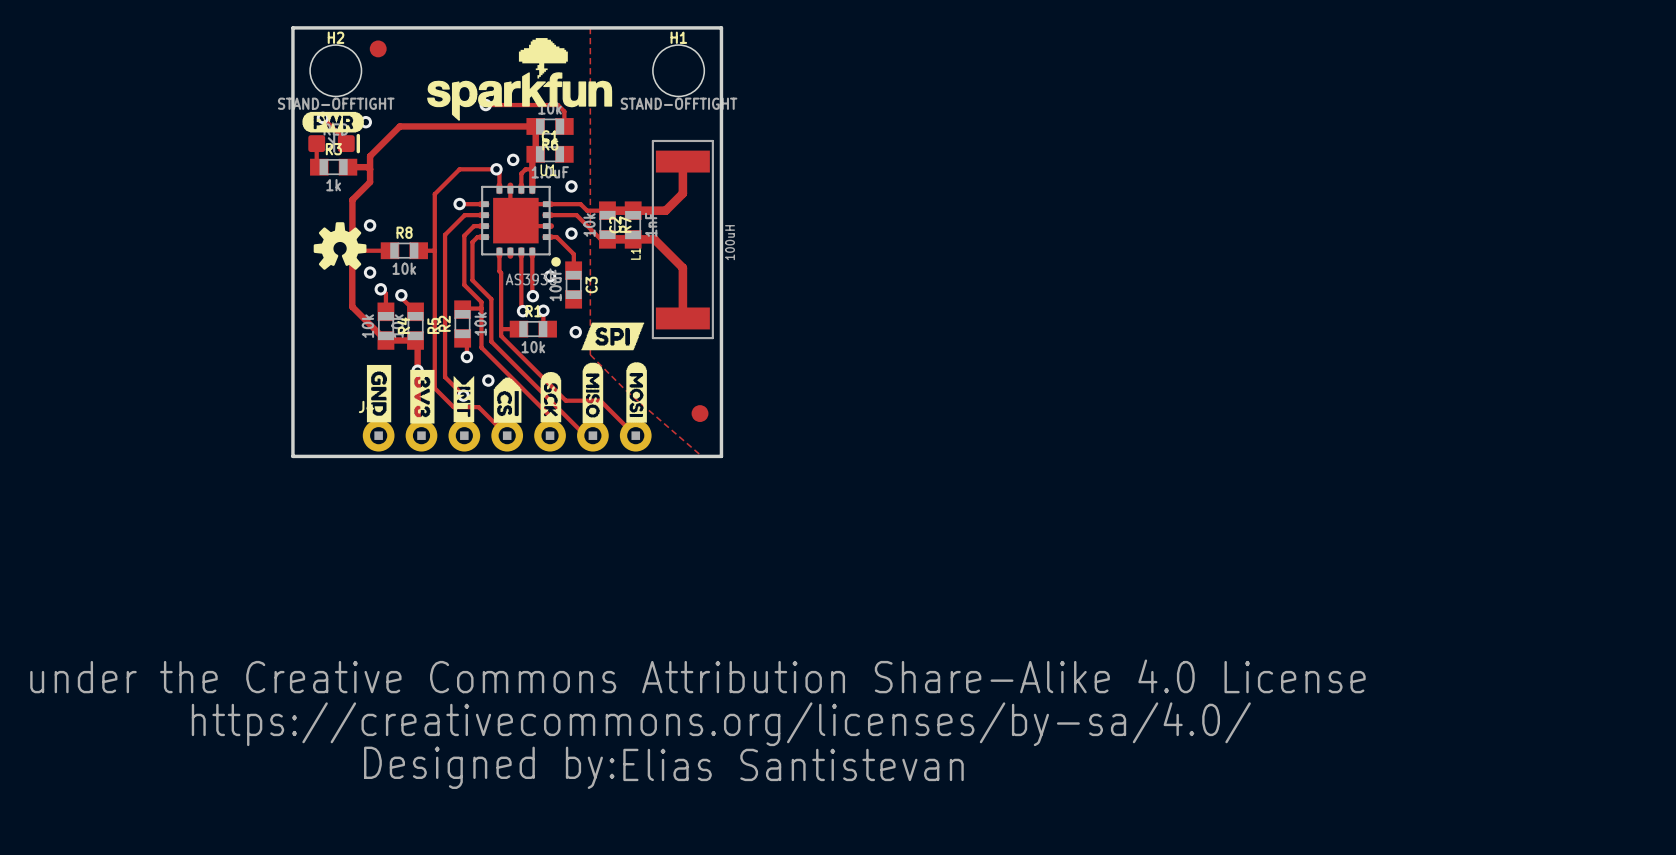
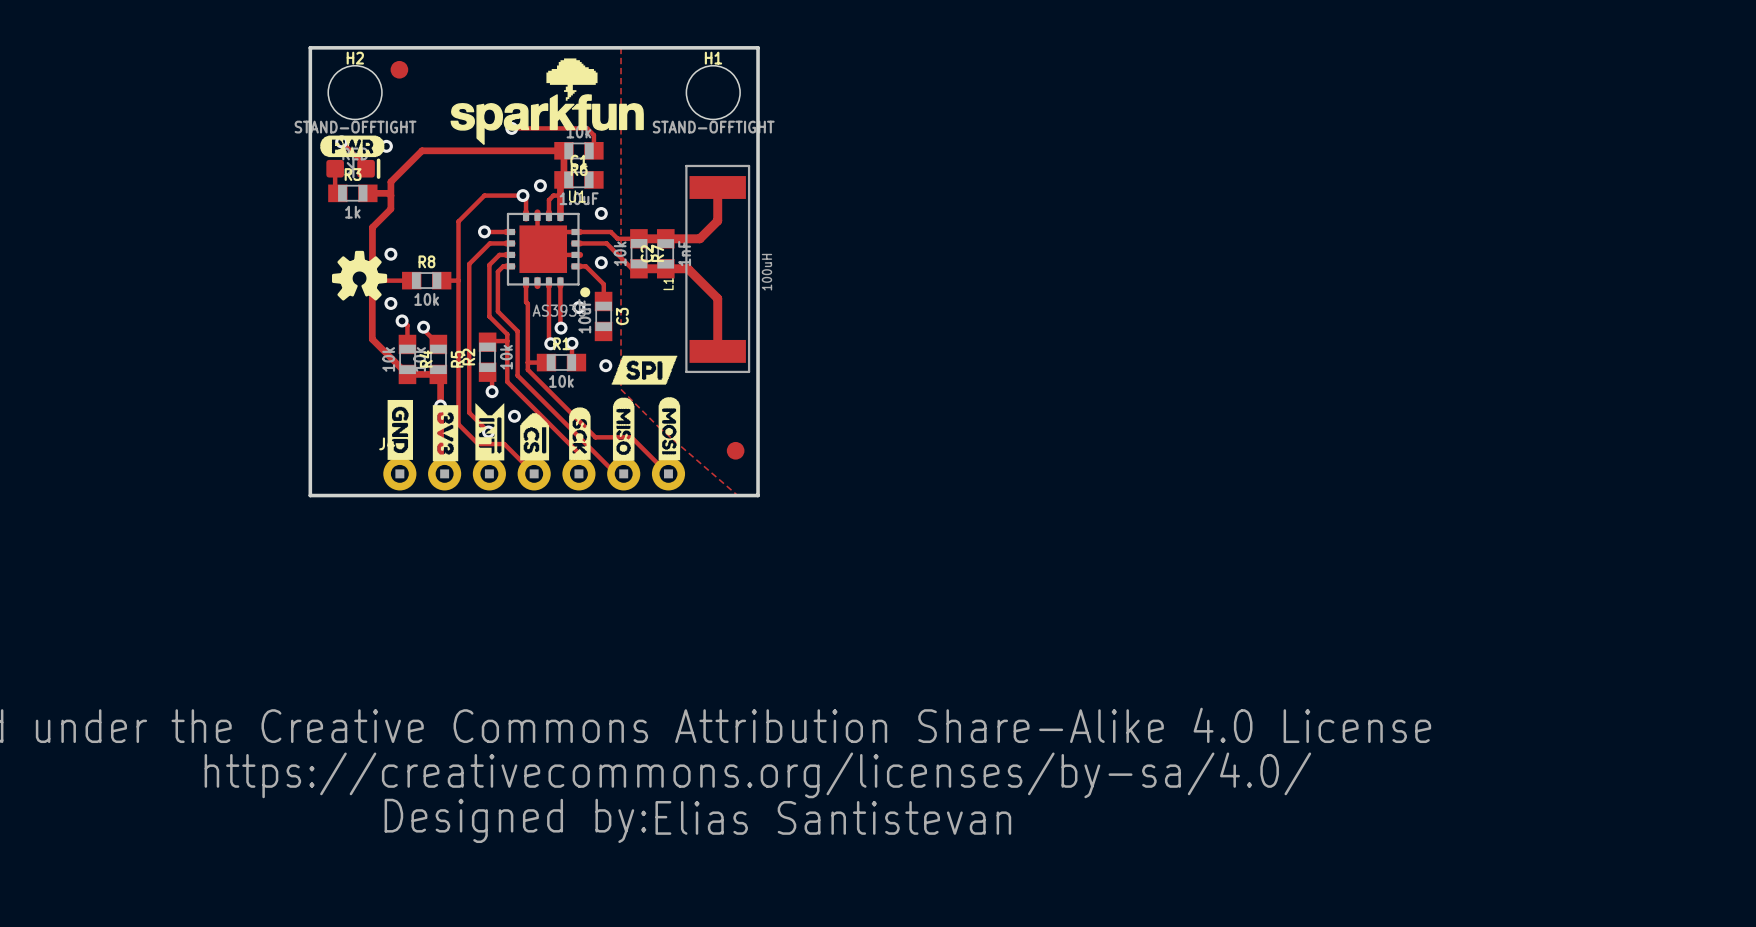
drawing shape: [453, 376, 475, 423] -> [475, 403, 505, 461]

